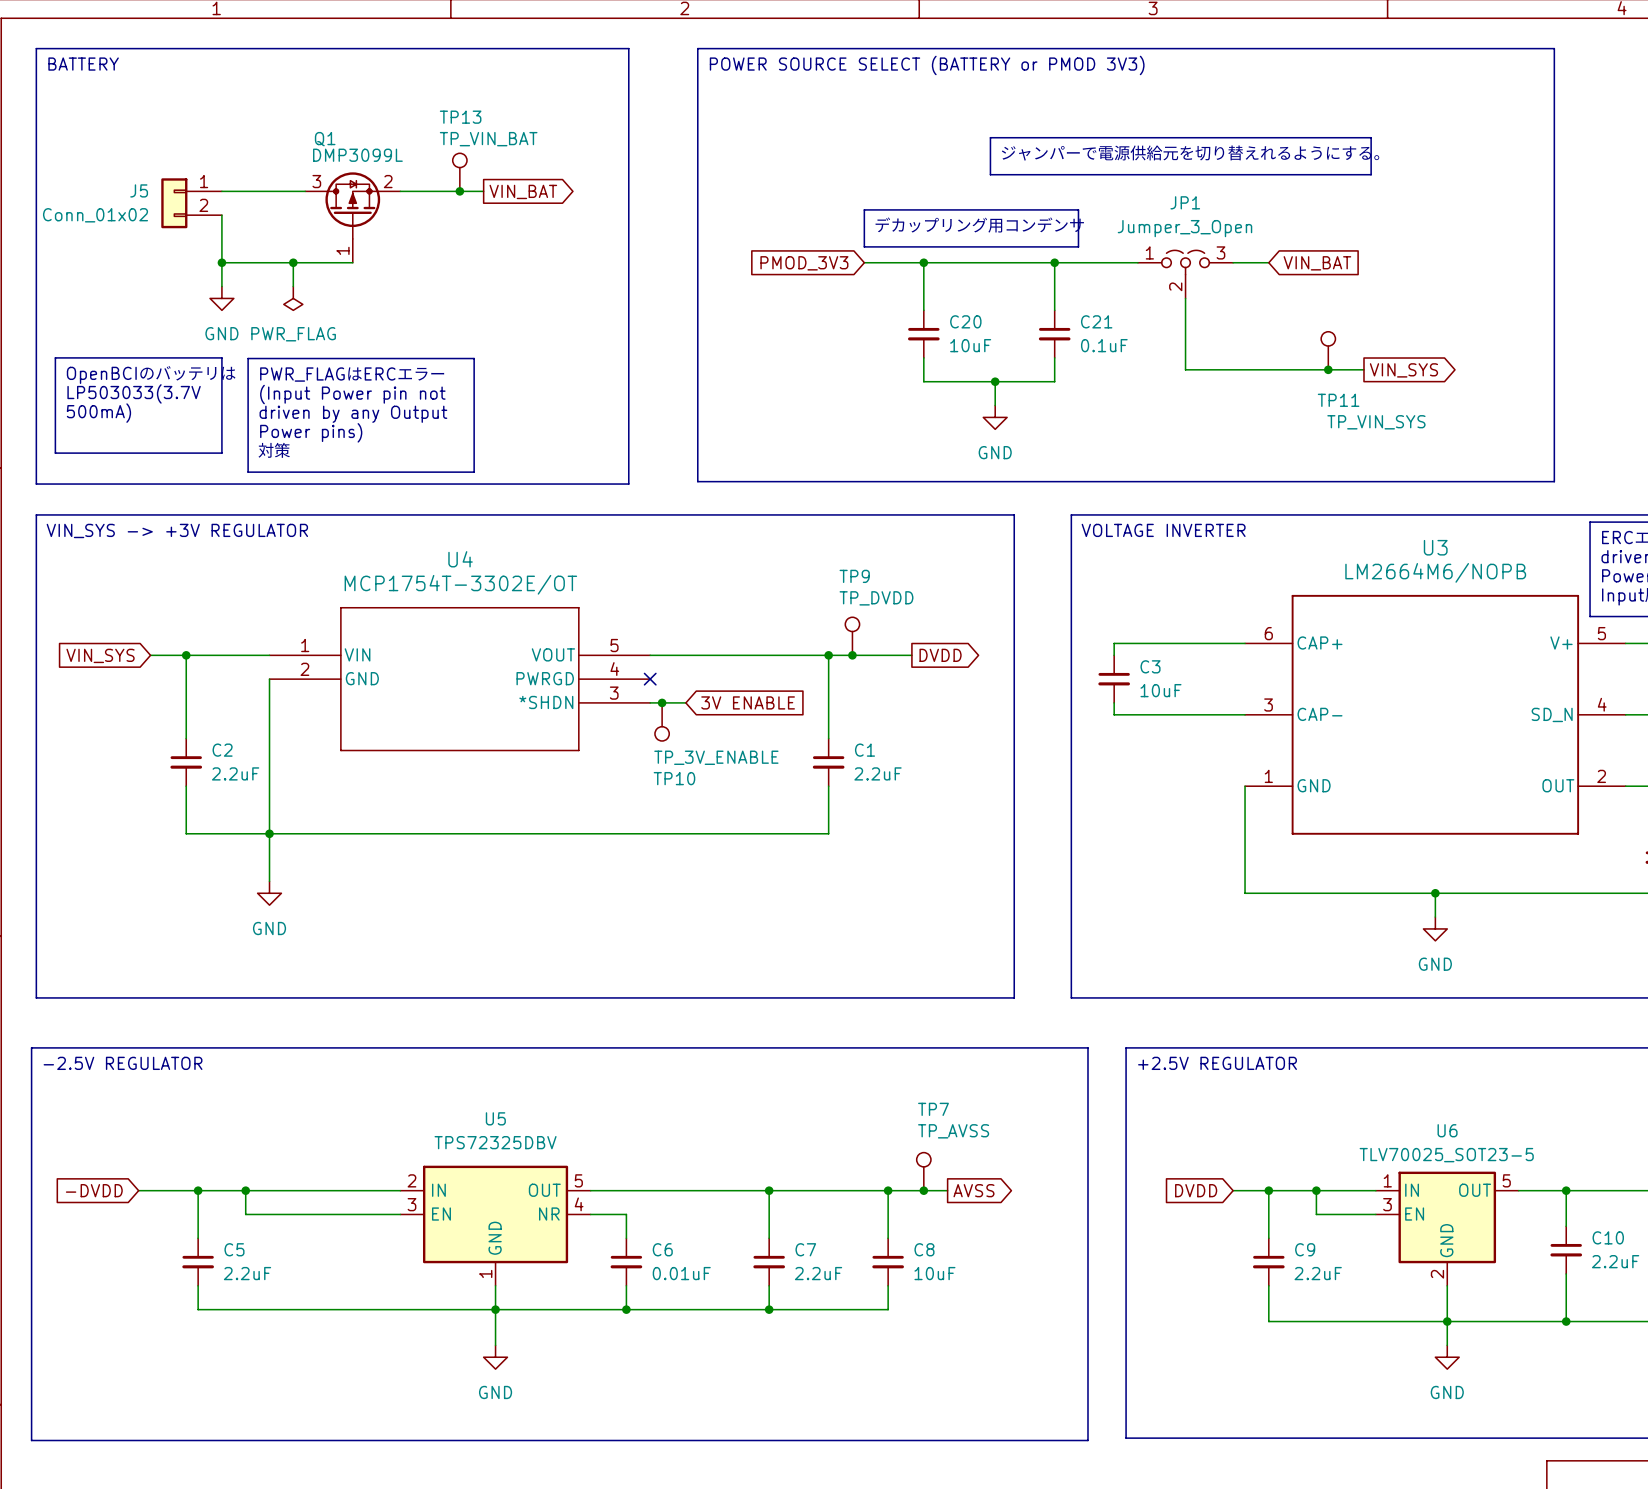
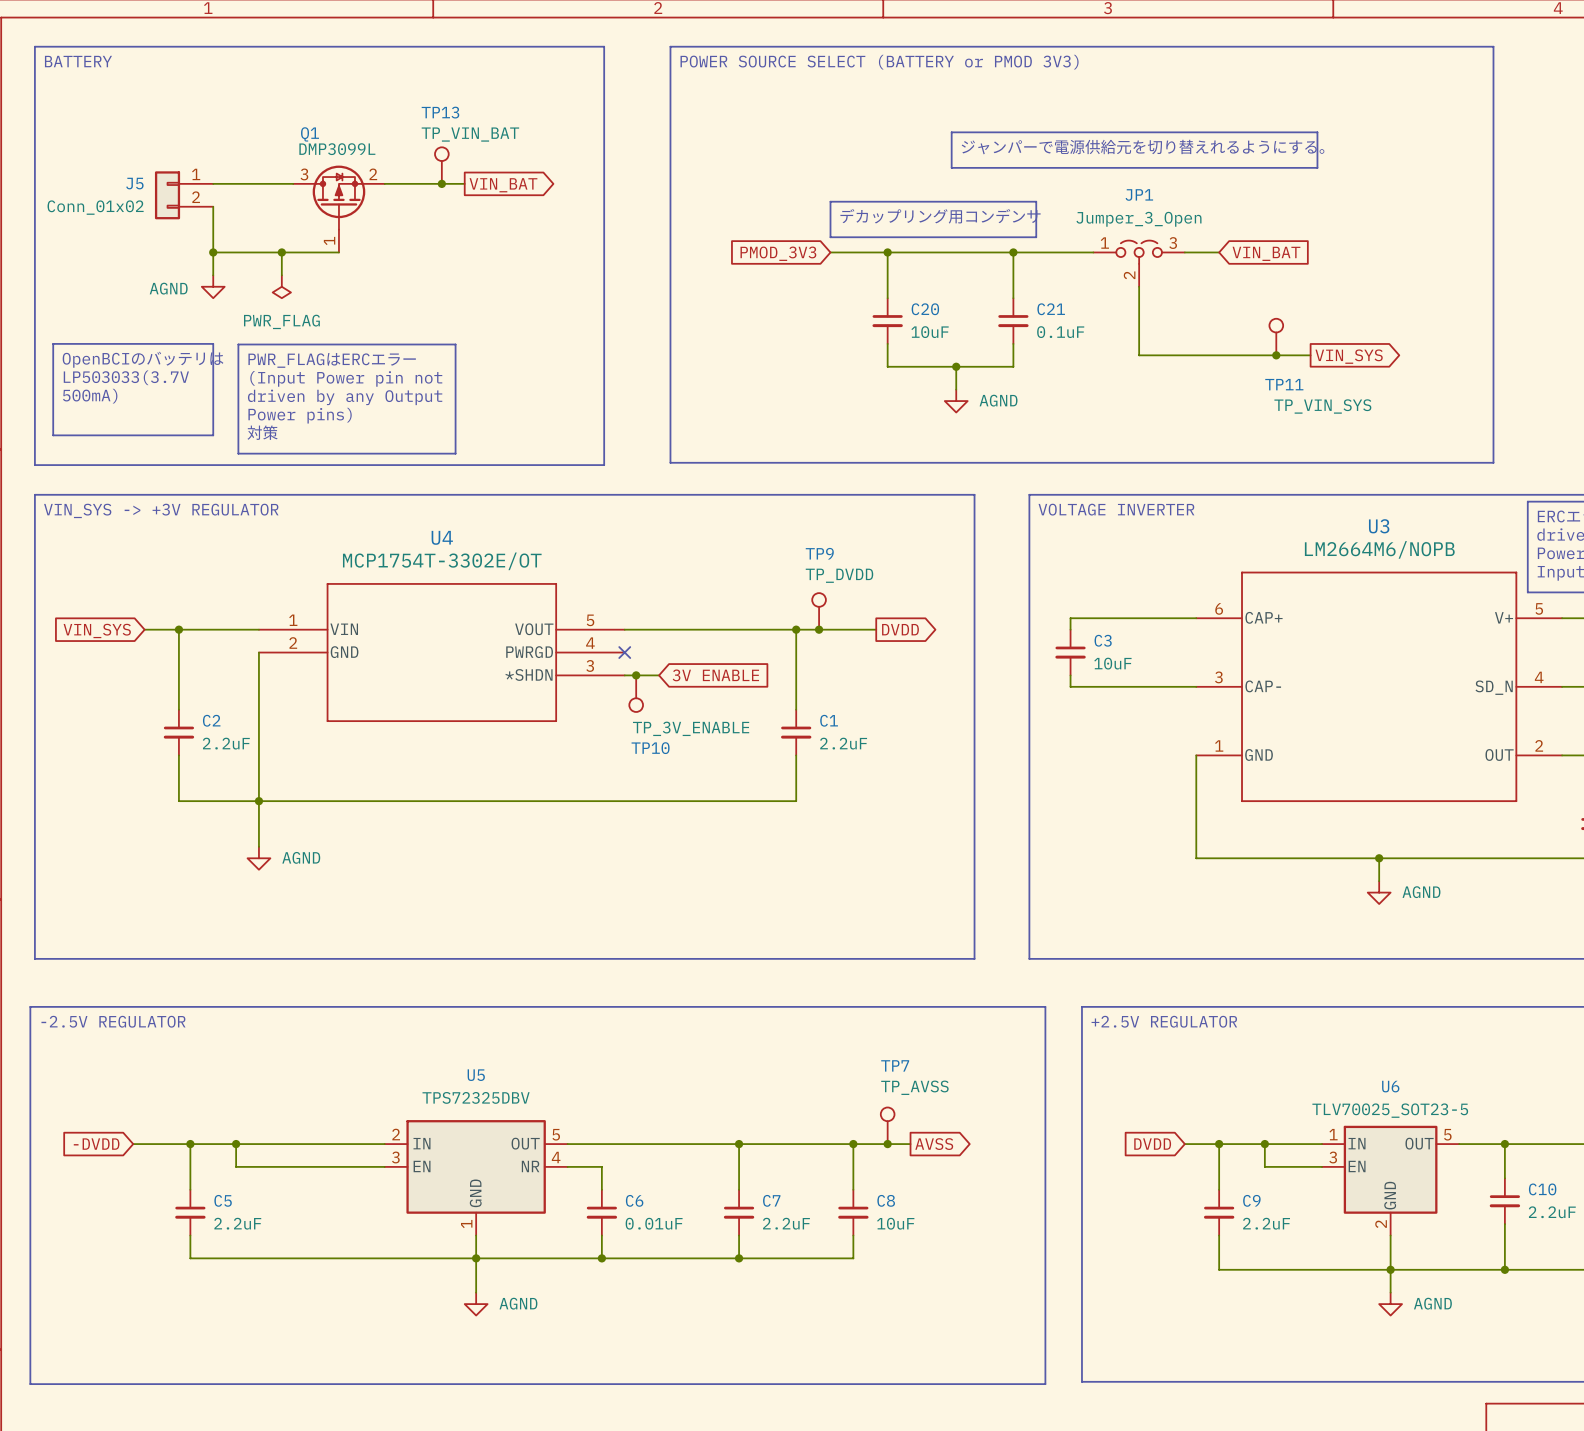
power symbol: GND (221, 298) -> AGND (213, 286)
power symbol: GND (995, 417) -> AGND (956, 401)
power symbol: GND (269, 893) -> AGND (258, 858)
power symbol: GND (1435, 928) -> AGND (1379, 892)
power symbol: GND (495, 1357) -> AGND (476, 1304)
power symbol: GND (1447, 1357) -> AGND (1390, 1304)

